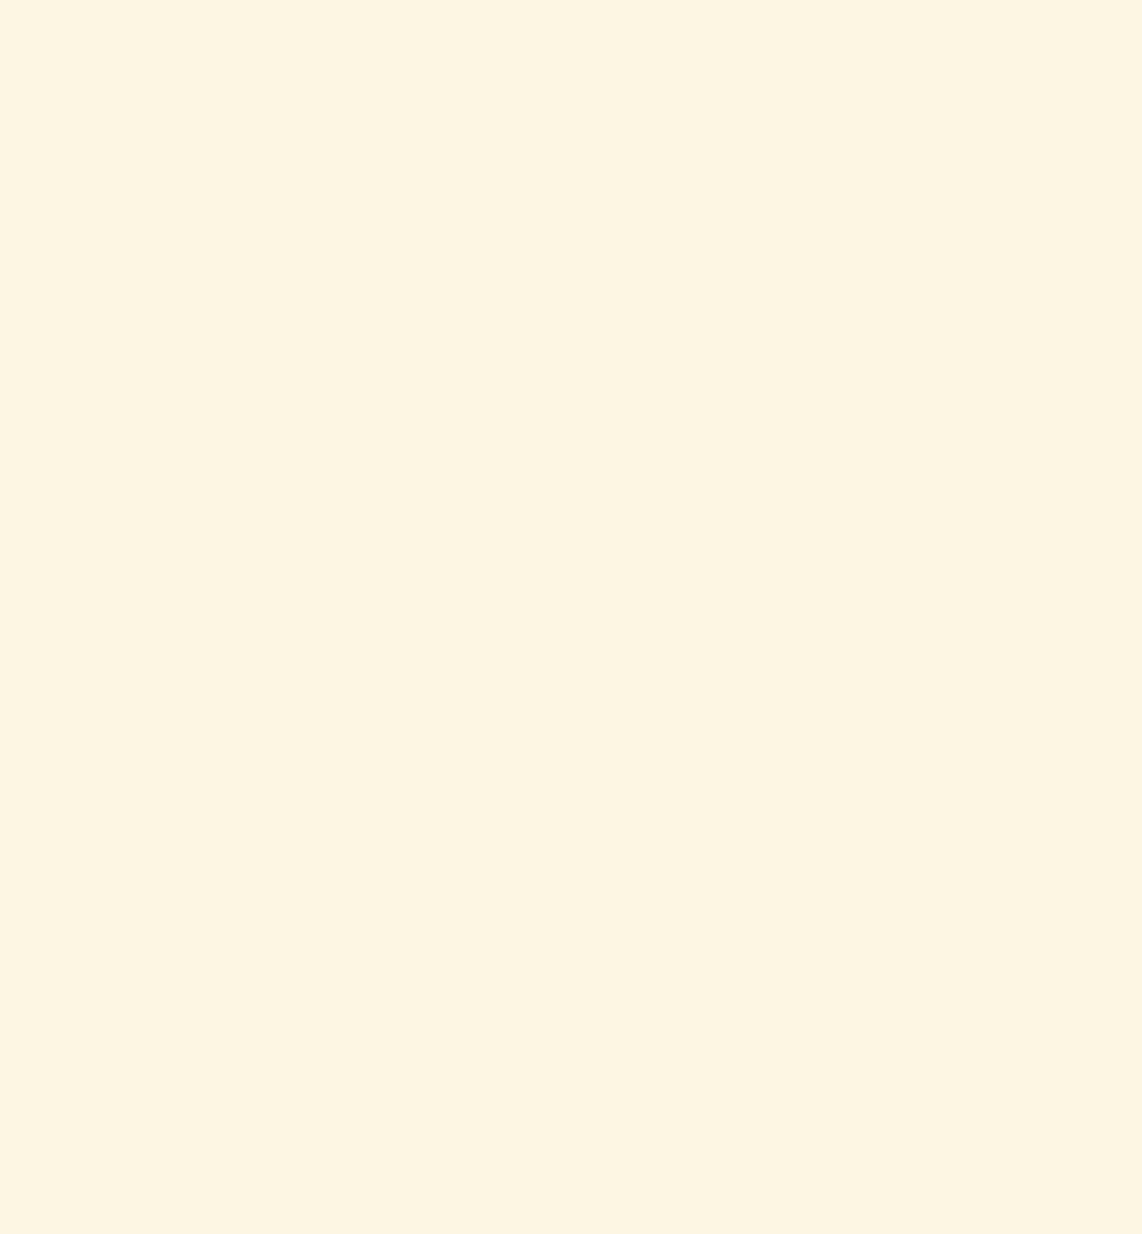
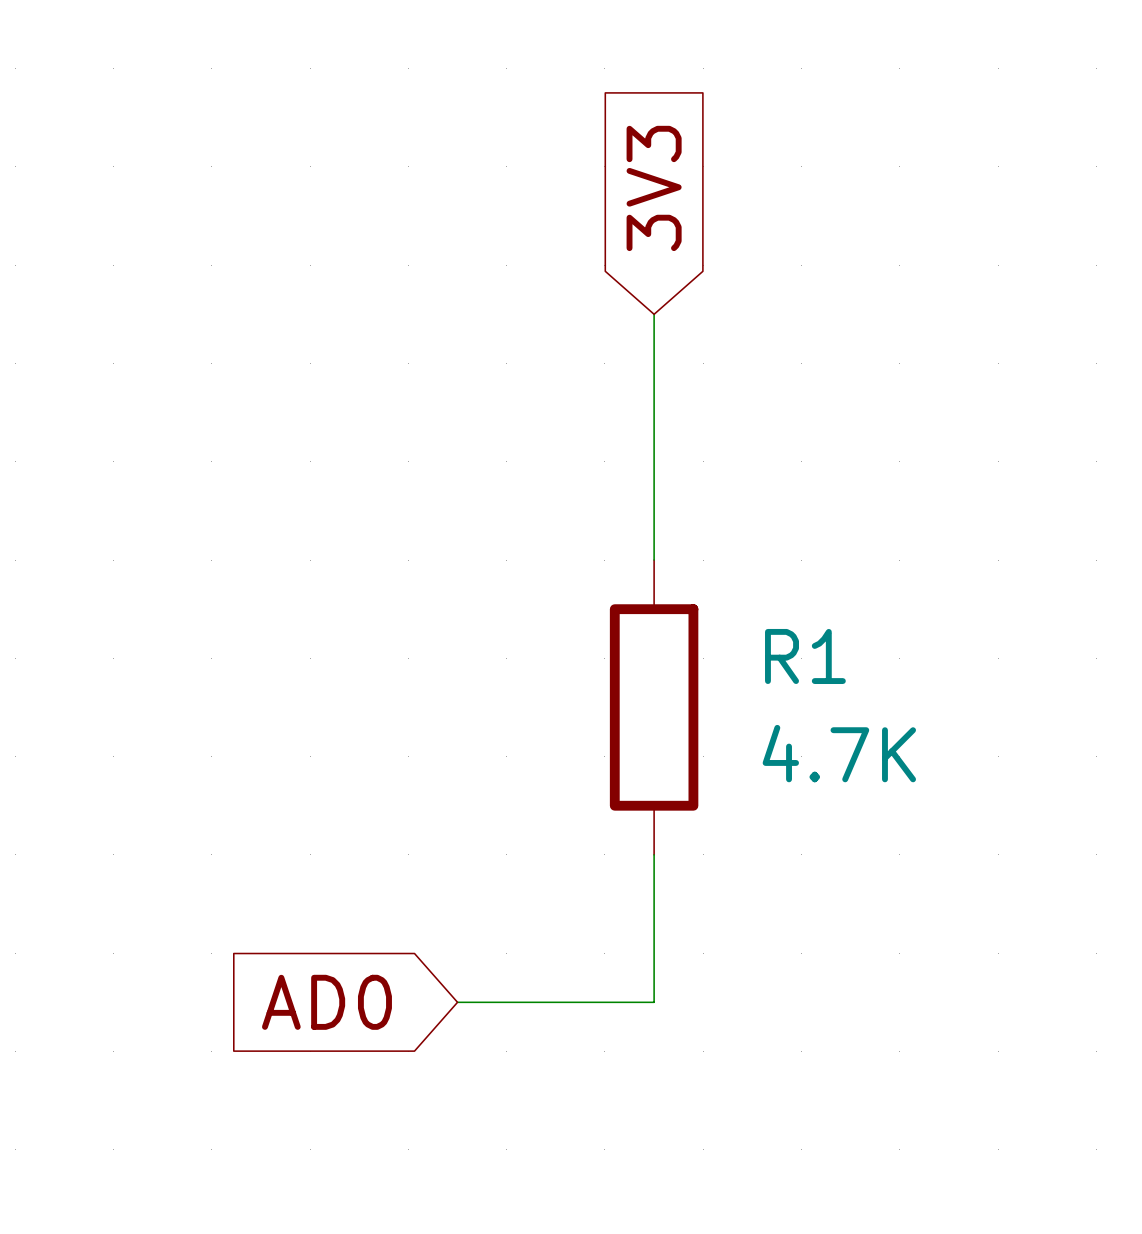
global label: none -> 3V3 (654, 188)
wire: none -> (654, 314) (654, 560)
R1: none -> 4.7K (654, 707)
wire: none -> (654, 854) (654, 1002) (457, 1002)
global label: none -> AD0 (326, 1002)

